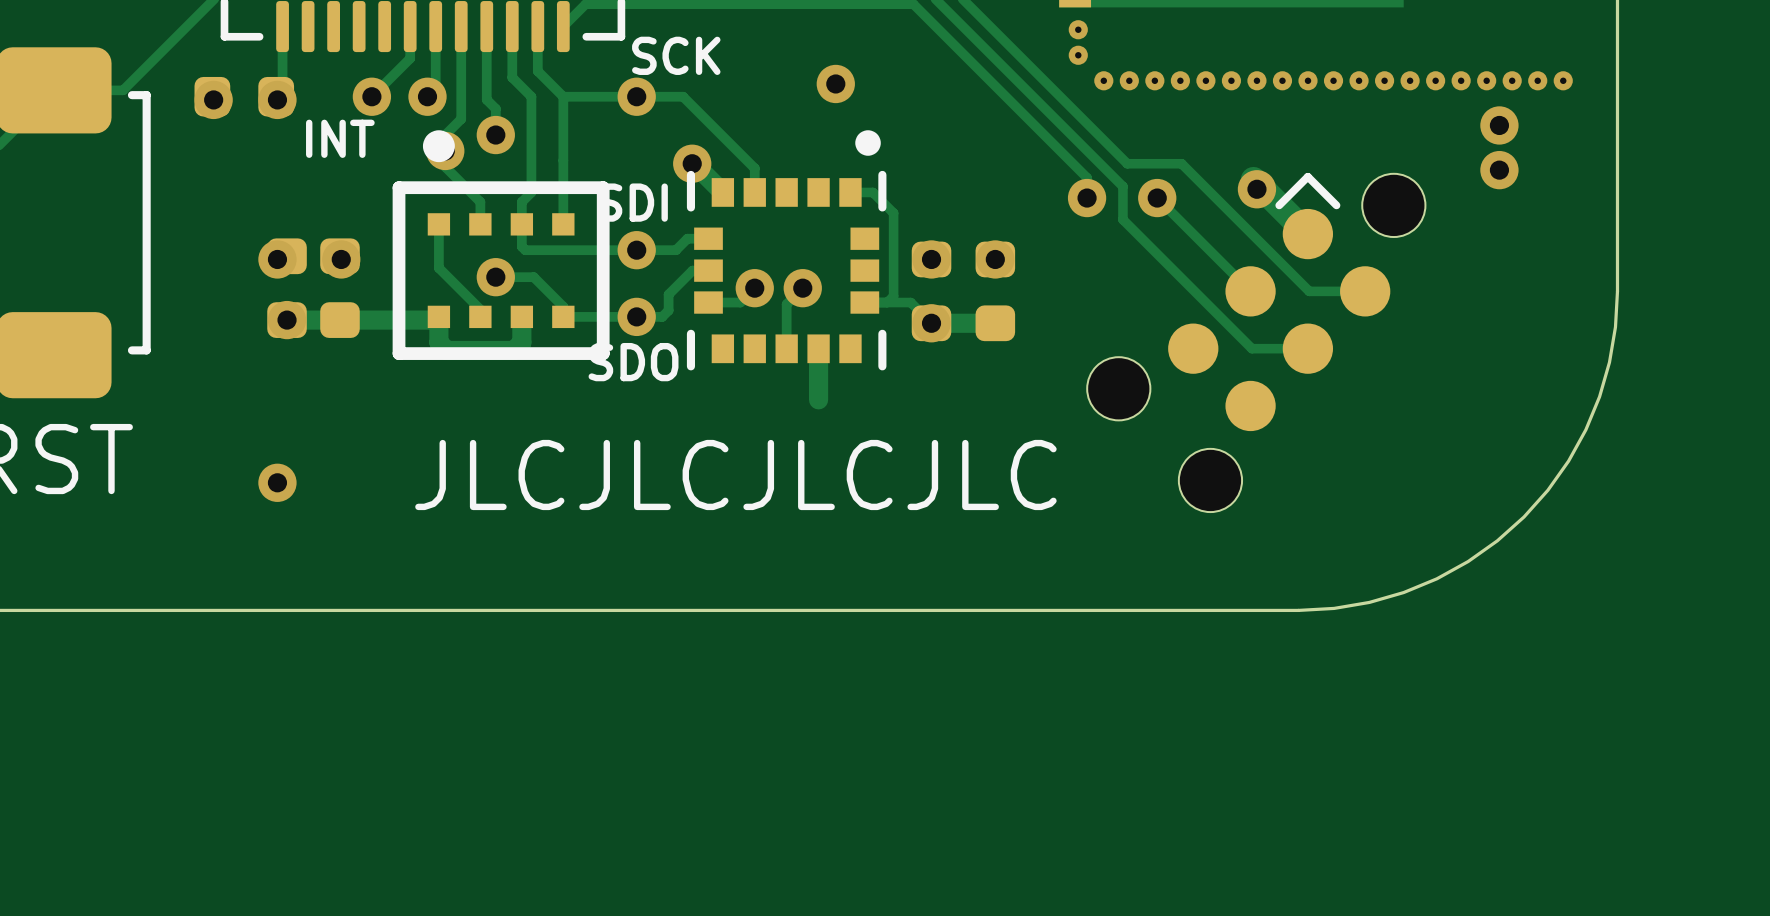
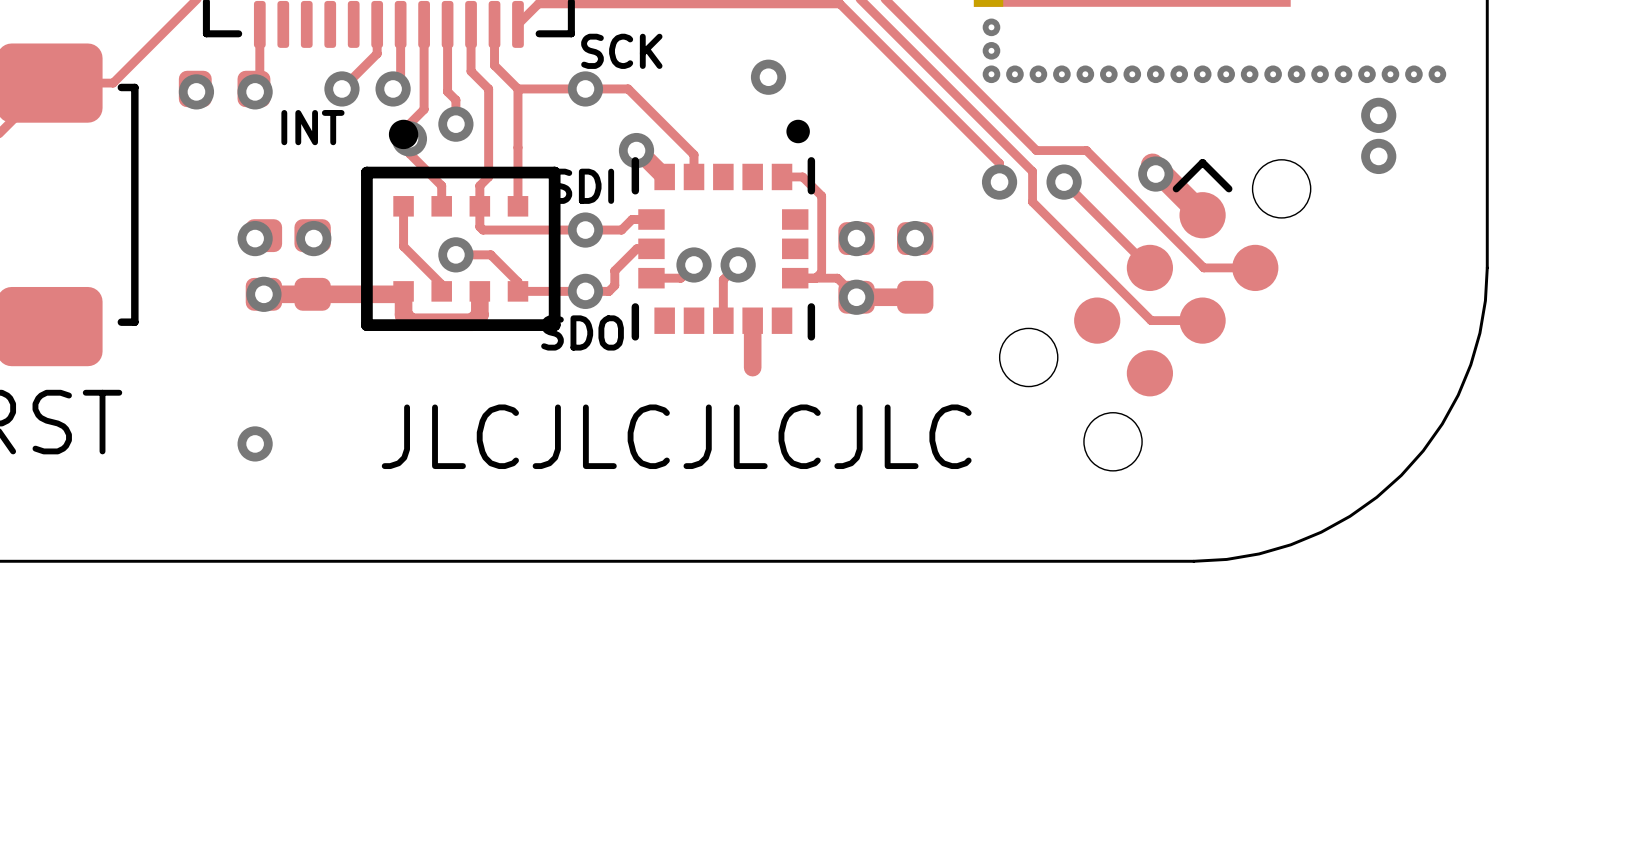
via: none -> (991, 74)

